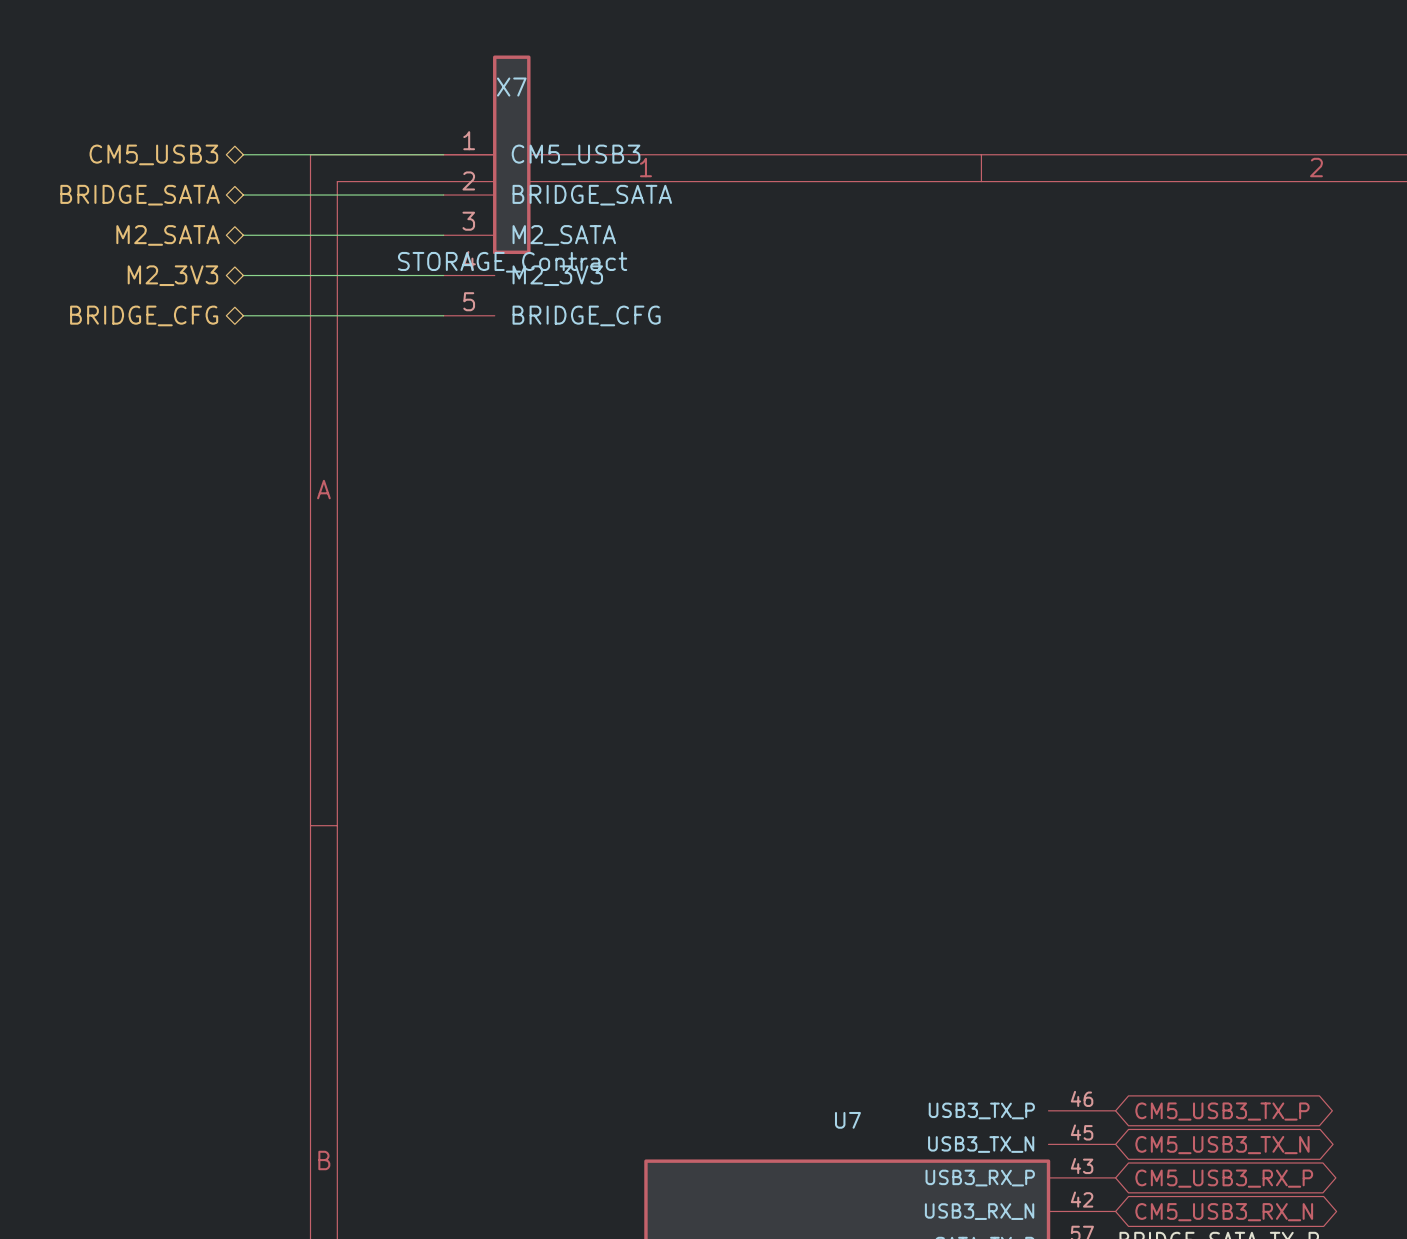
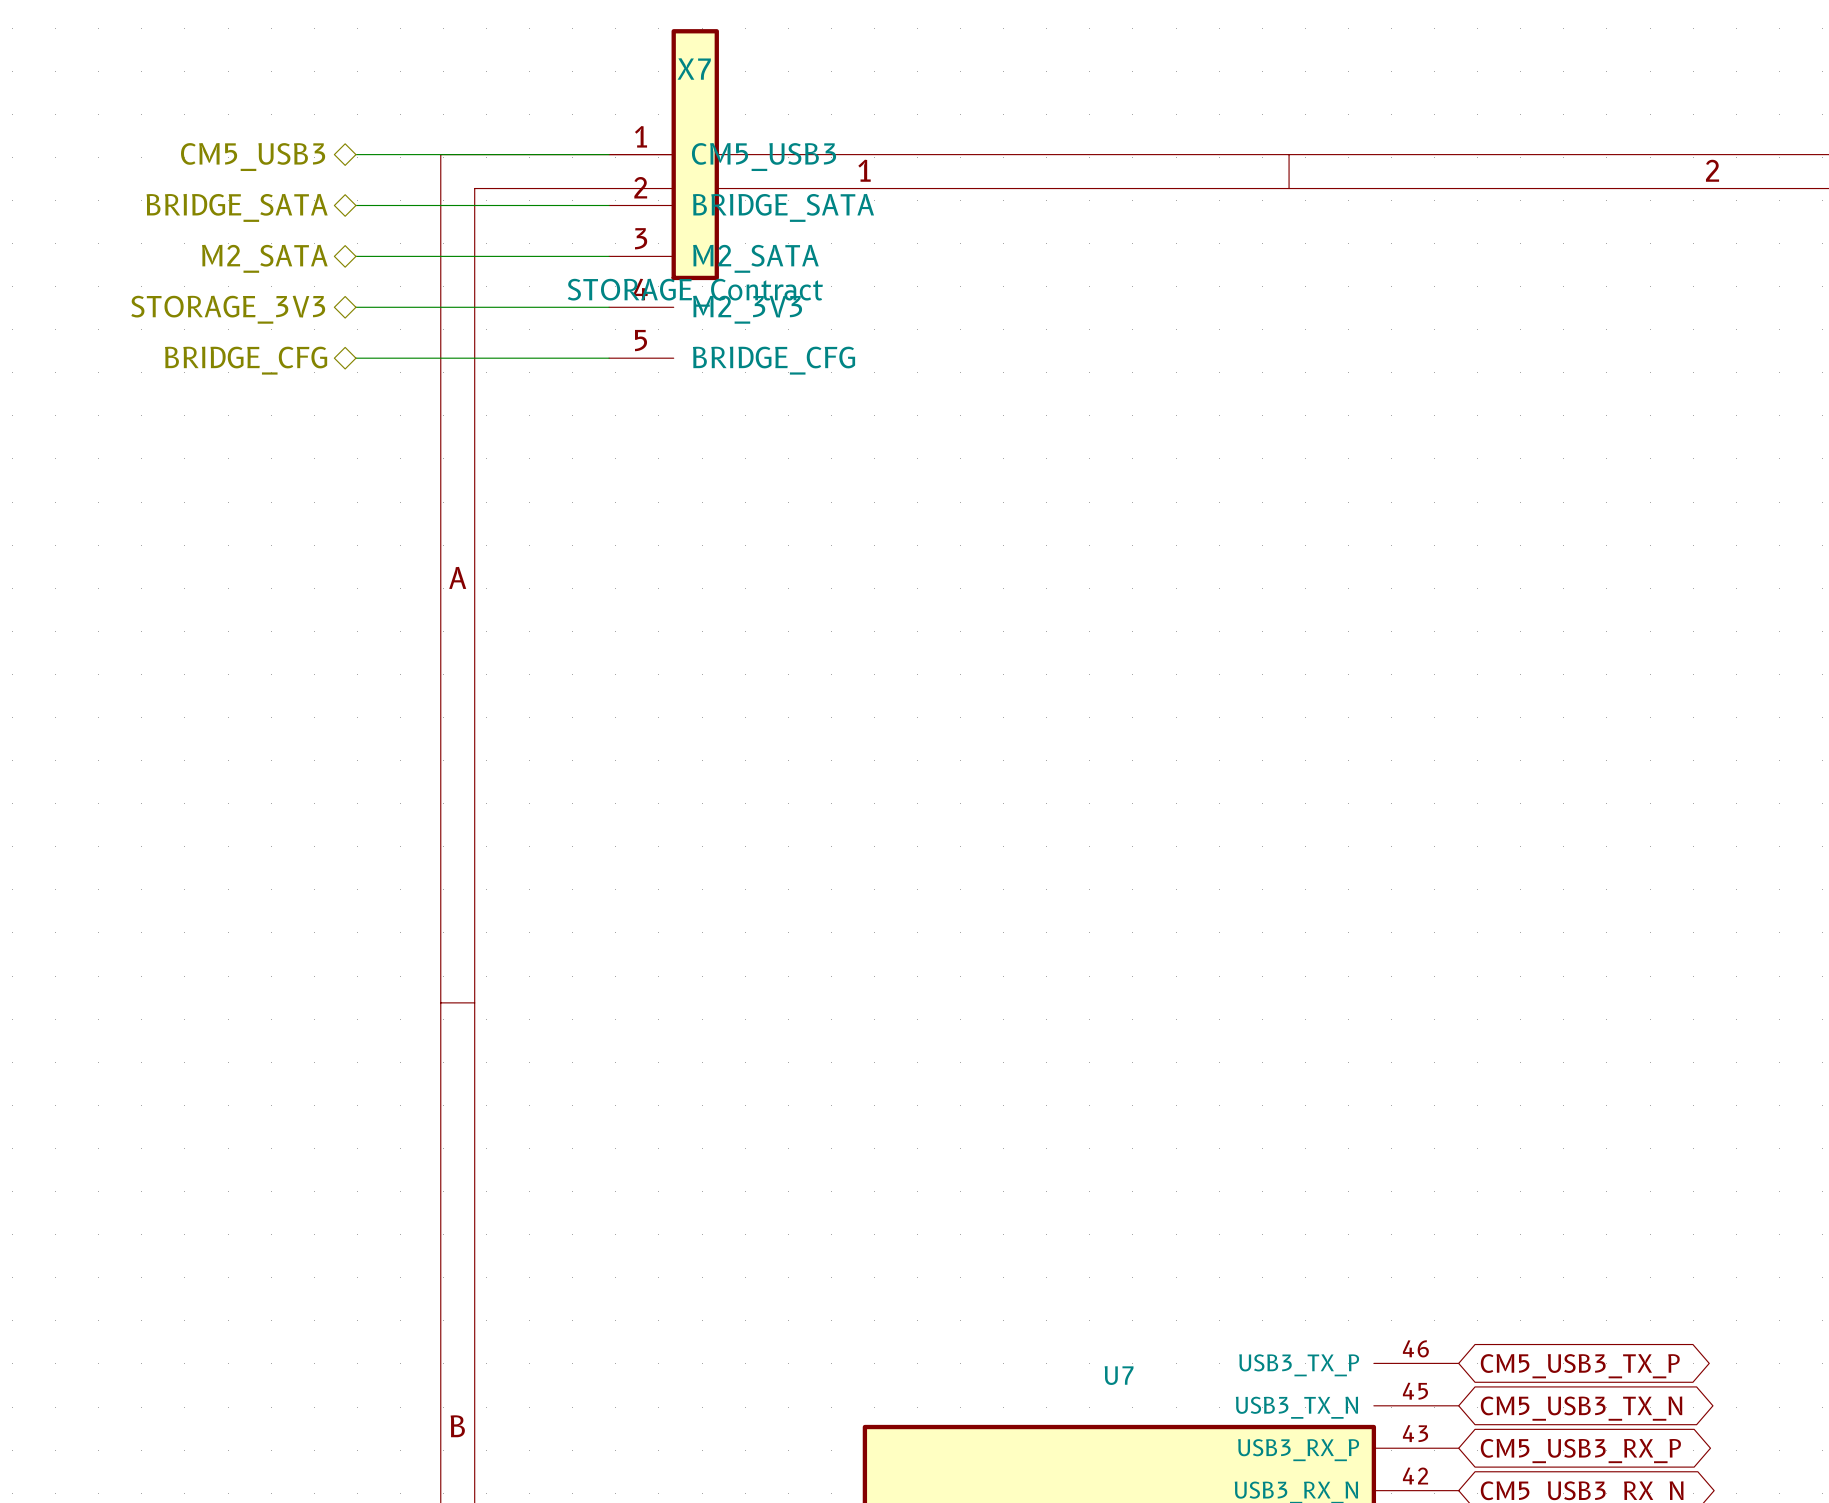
hierarchical label: M2_3V3 (172, 275) -> STORAGE_3V3 (228, 309)

